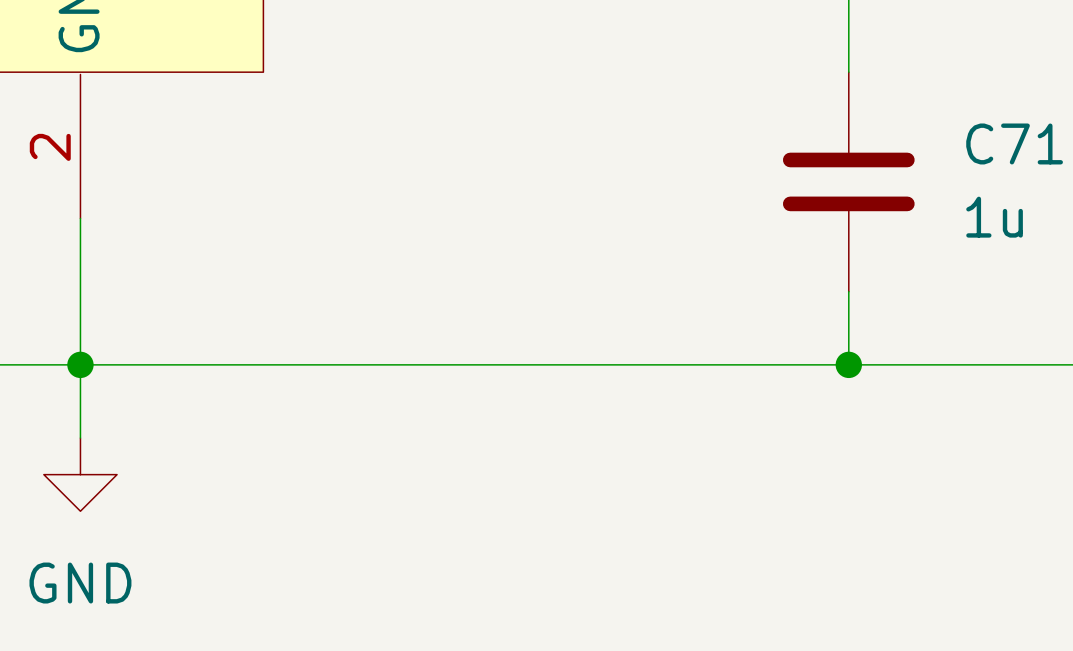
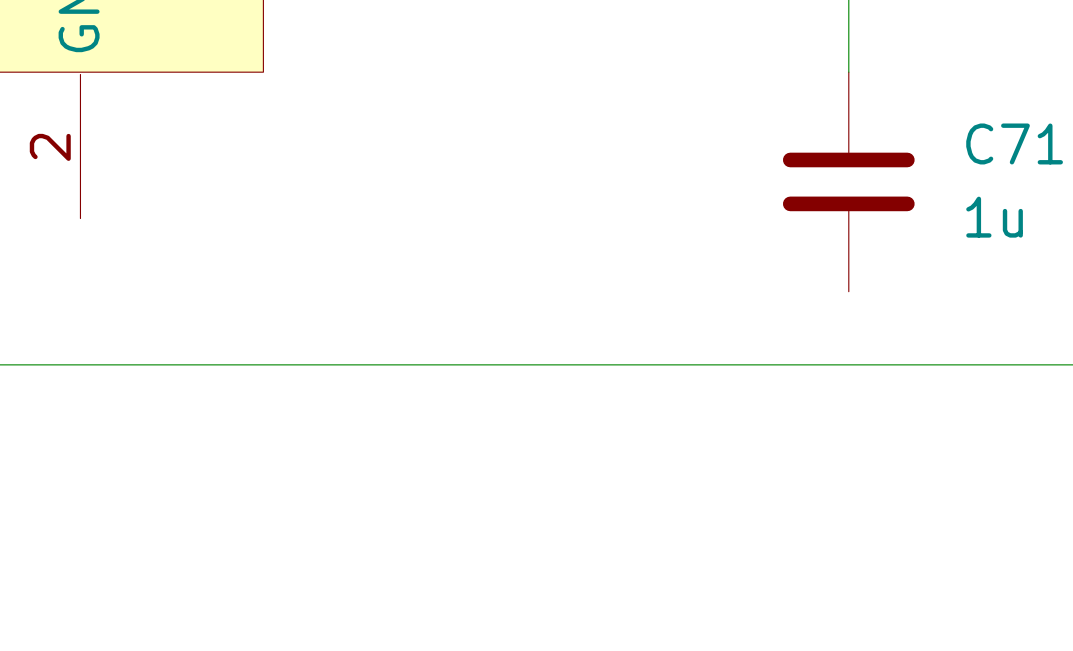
wire: (80, 218) (80, 438) -> none
wire: (848, 291) (848, 364) -> none
junction: (80, 364) -> none
junction: (848, 364) -> none
power symbol: GND (80, 474) -> none

